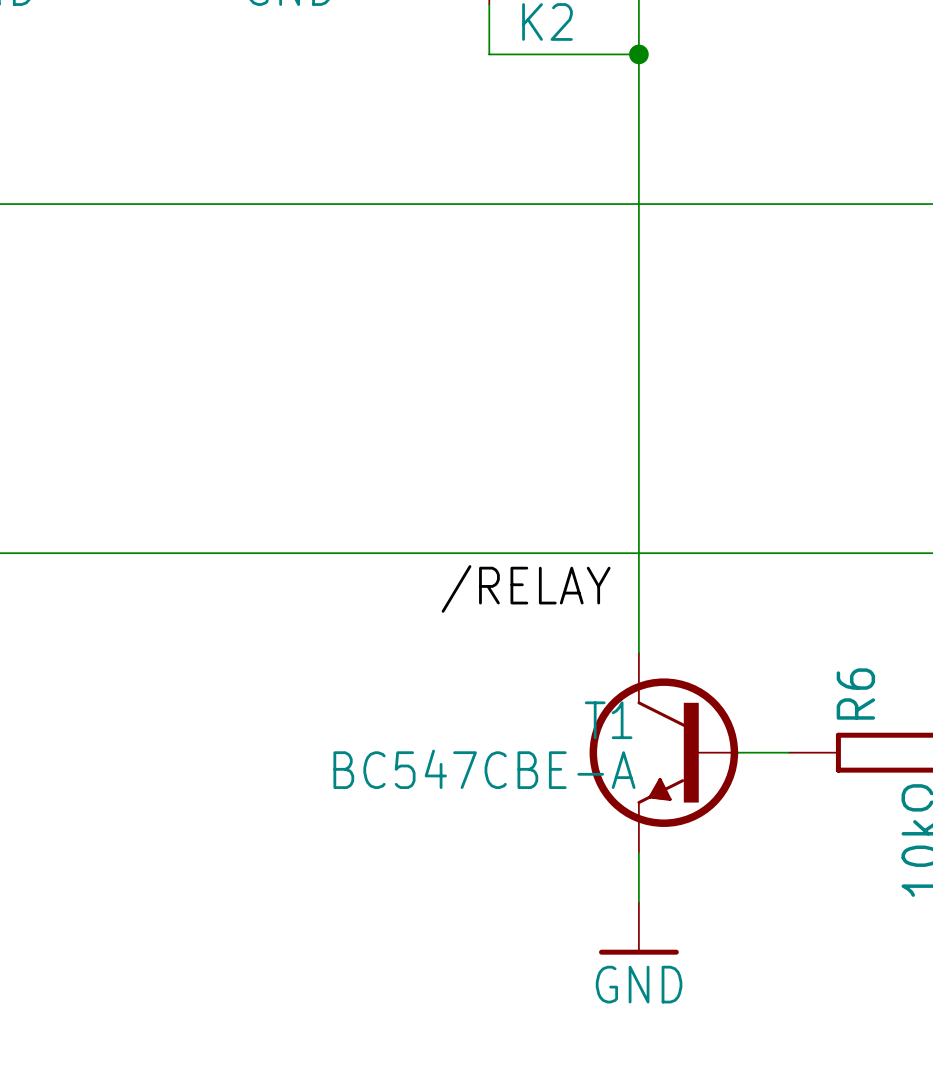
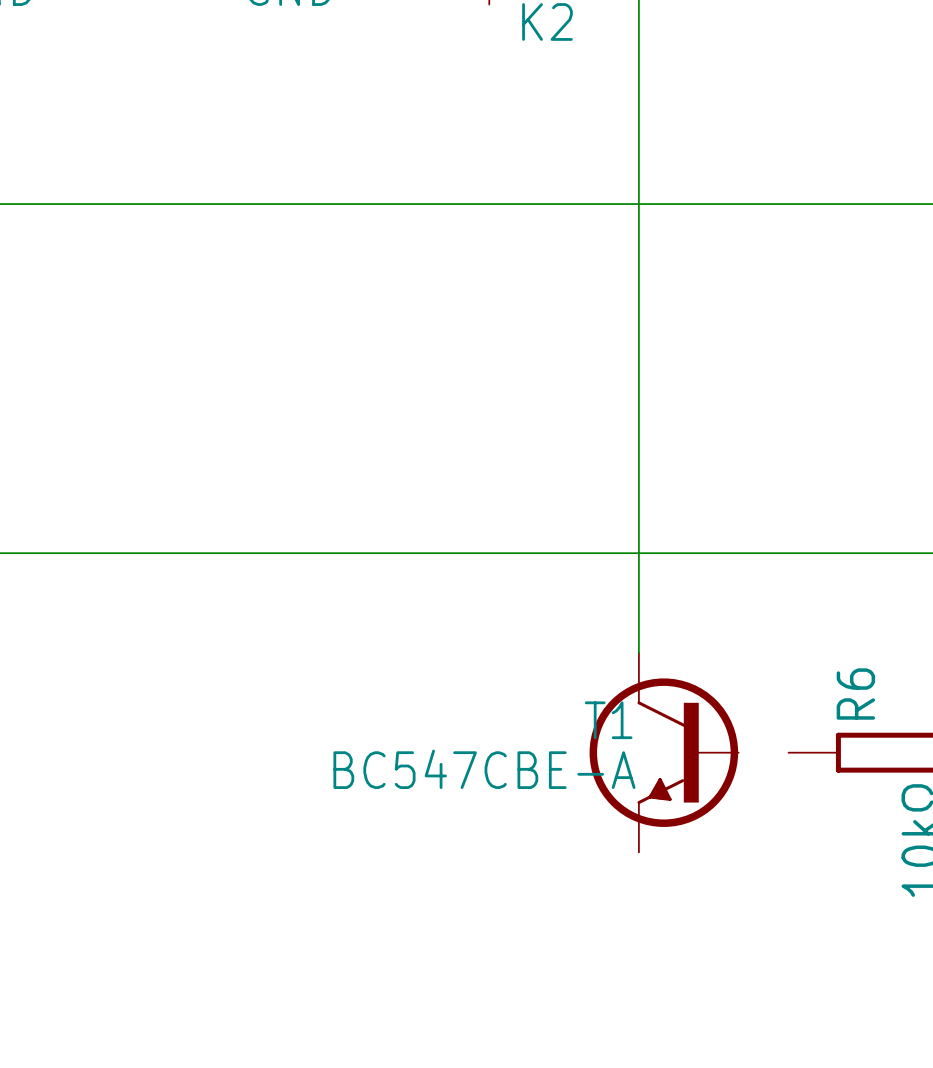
wire: (489, 4) (489, 54) (638, 54) -> none
junction: (638, 54) -> none
label: /RELAY (526, 588) -> none
wire: (738, 752) (788, 752) -> none
wire: (638, 852) (638, 902) -> none
power symbol: GND (638, 928) -> none

